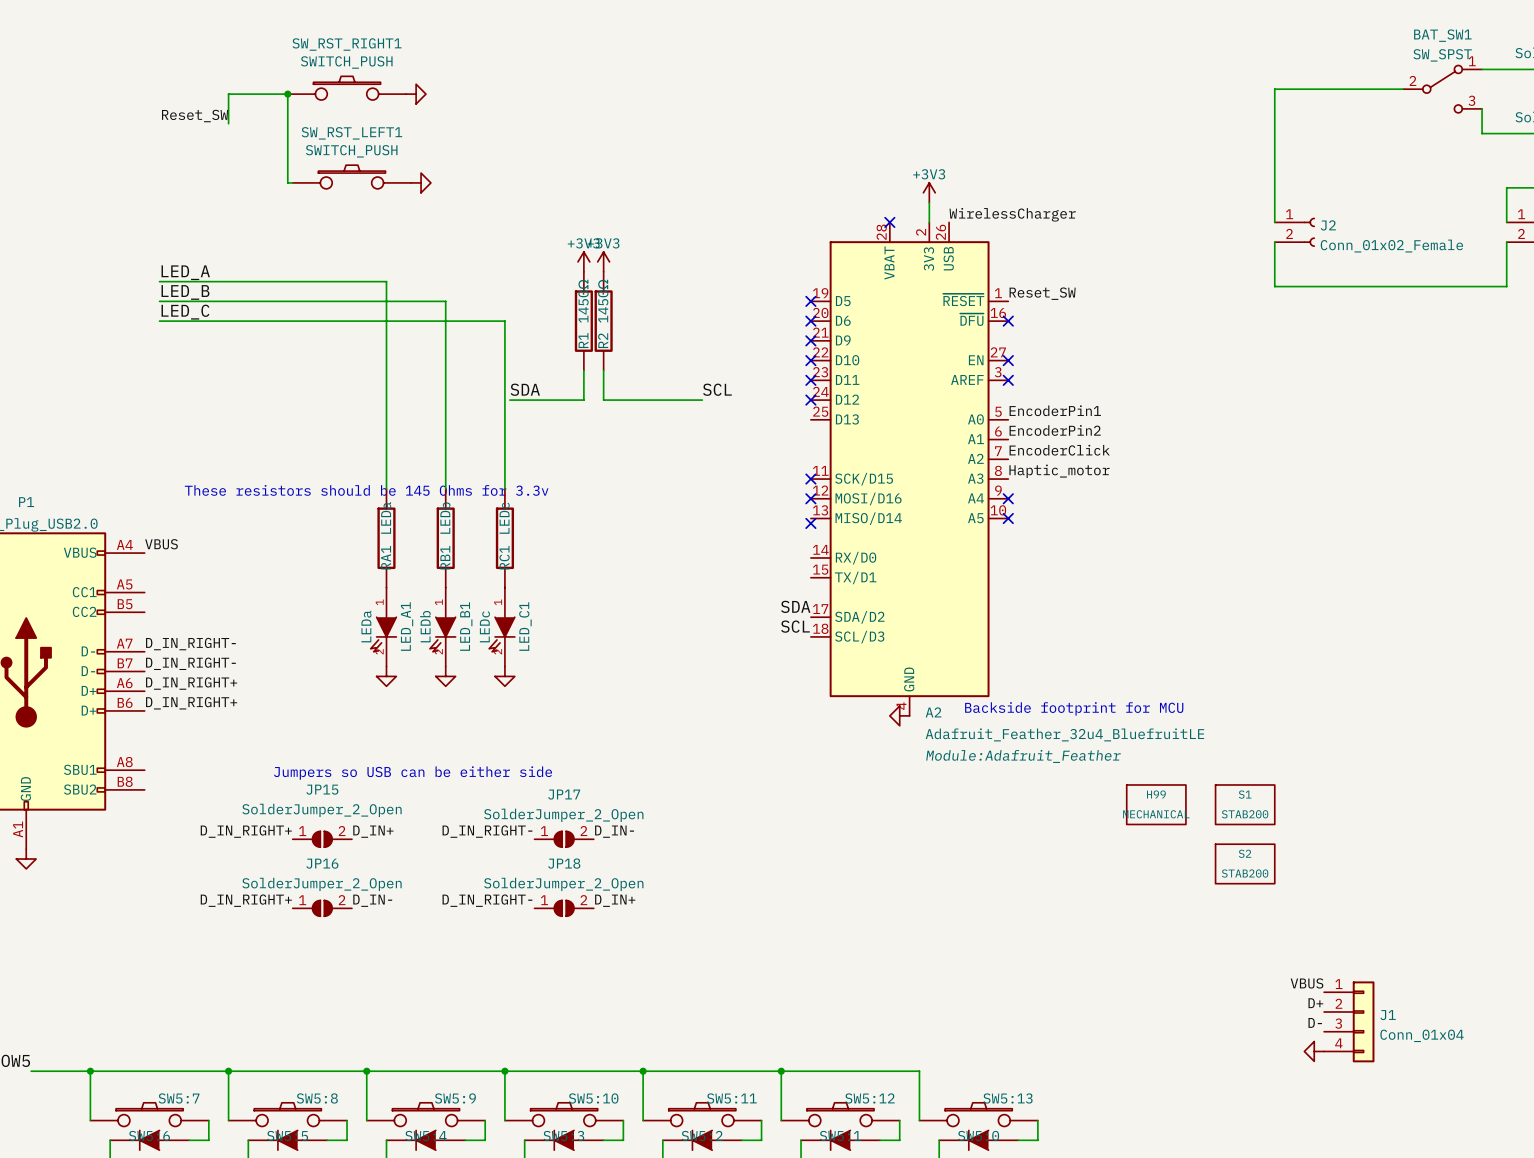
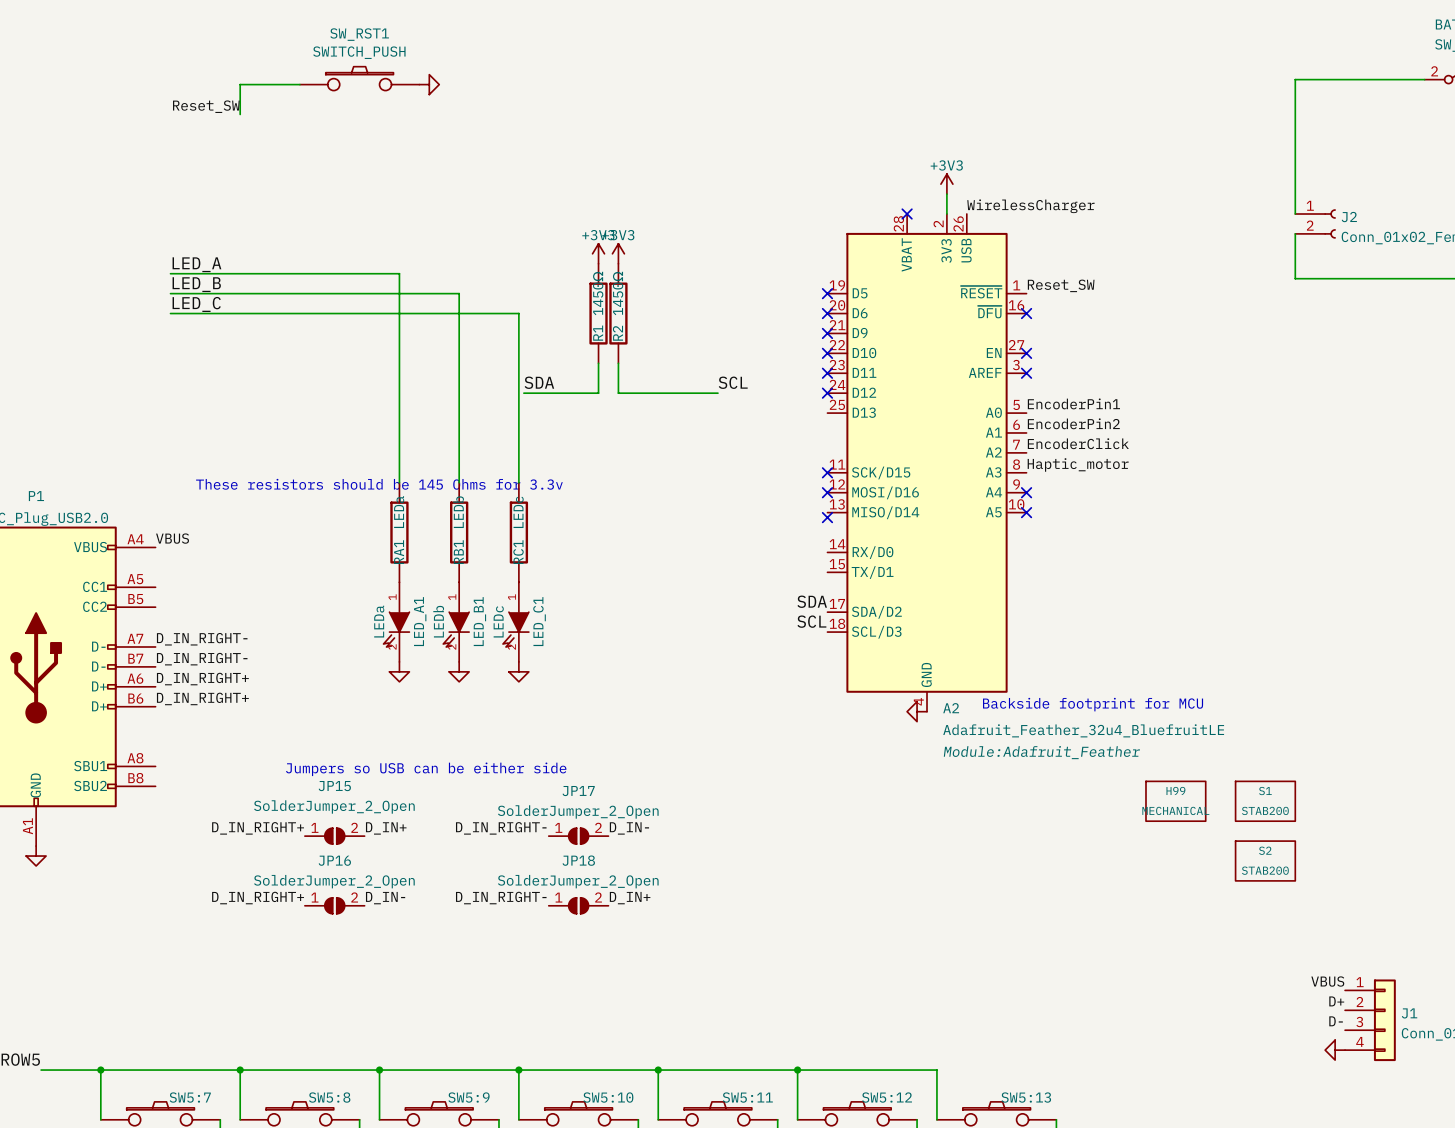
SW_RST_RIGHT1 name: SW_RST_RIGHT1 (347, 44) -> SW_RST1 (359, 34)
wire: (287, 94) (287, 182) (292, 182) -> none
junction: (287, 94) -> none
SW_RST_LEFT1: SWITCH_PUSH (351, 177) -> none
power symbol: (421, 182) -> none

